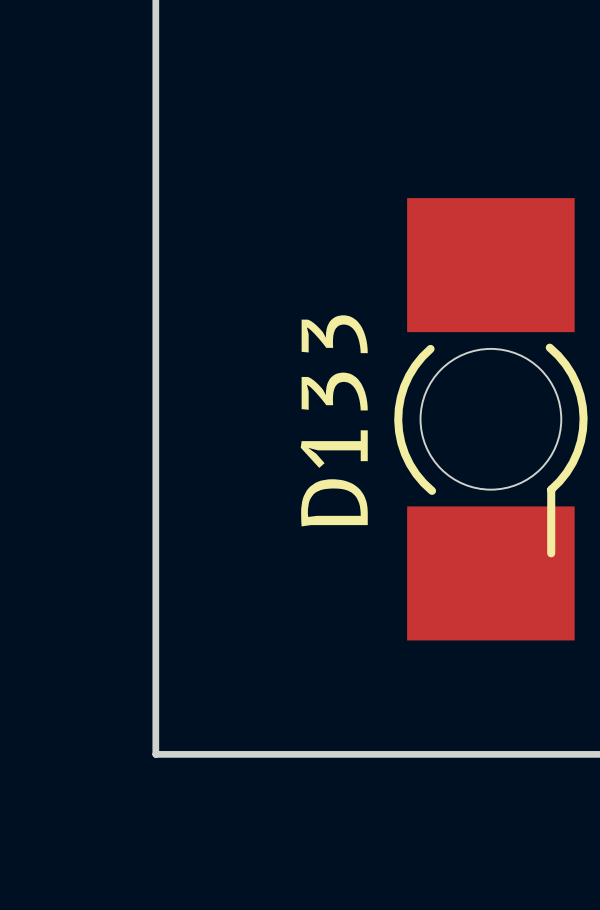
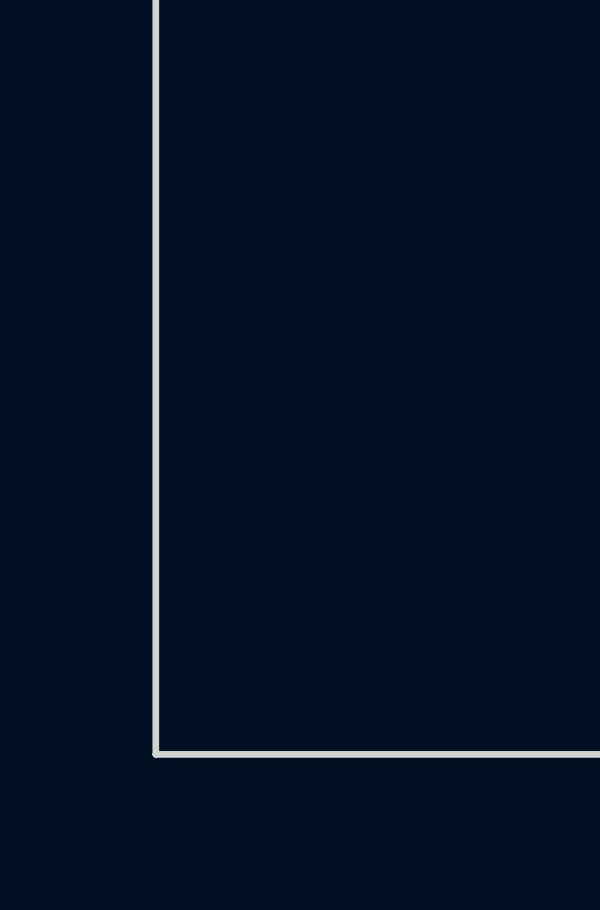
D133: (490, 419) -> none

